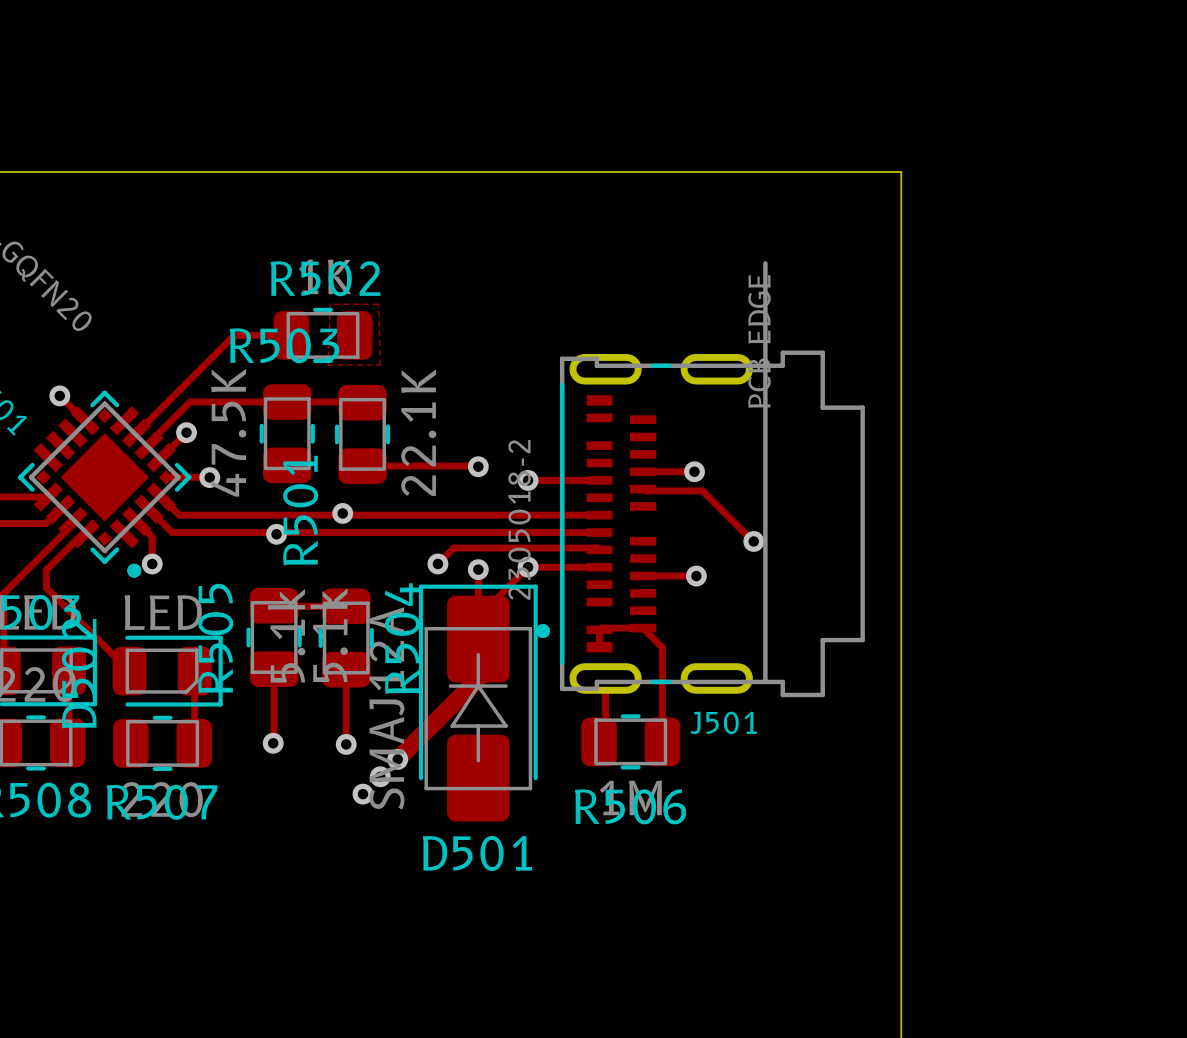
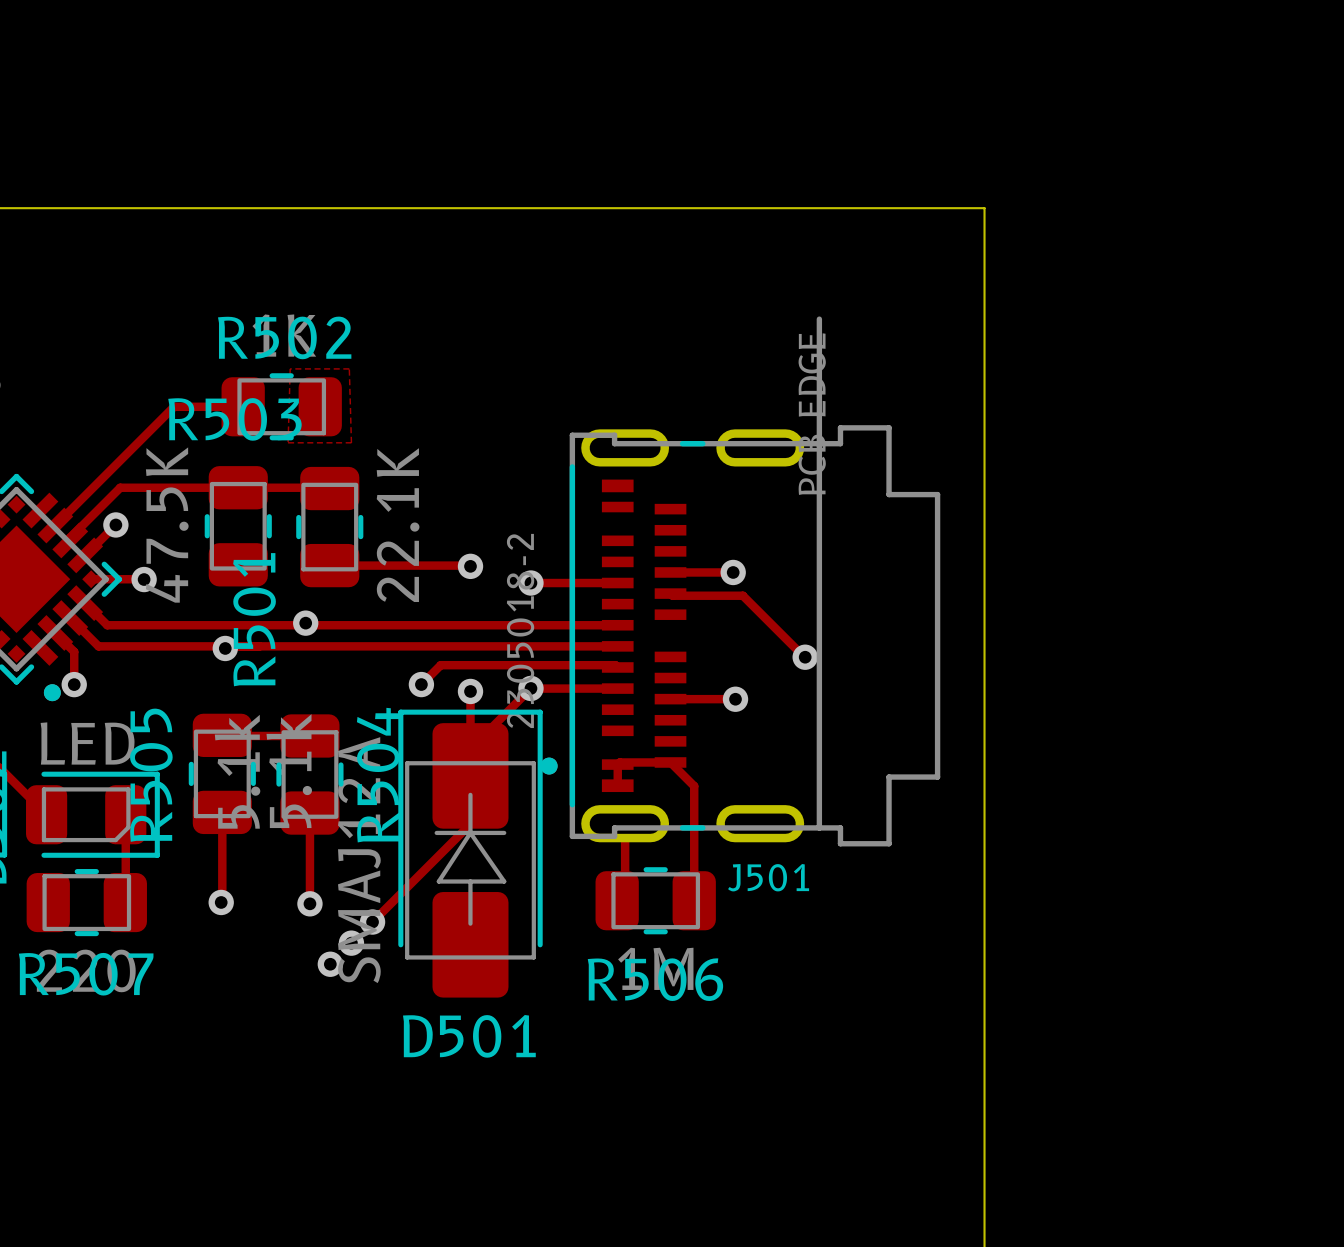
track width: thick (478, 678) (397, 759) -> thin (470, 824) (372, 922)

